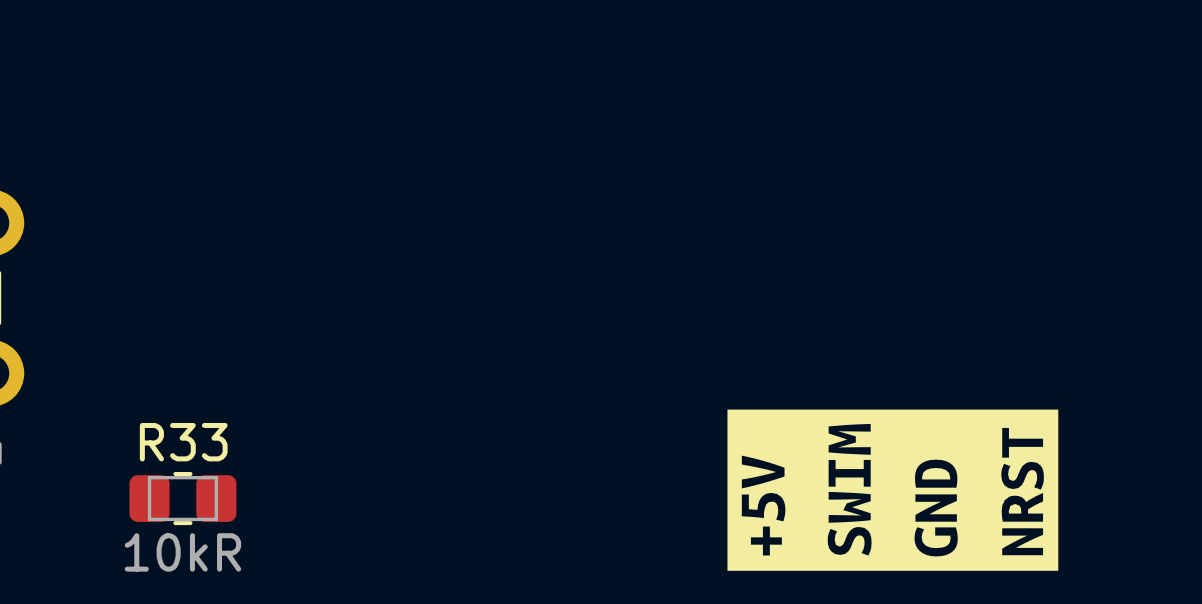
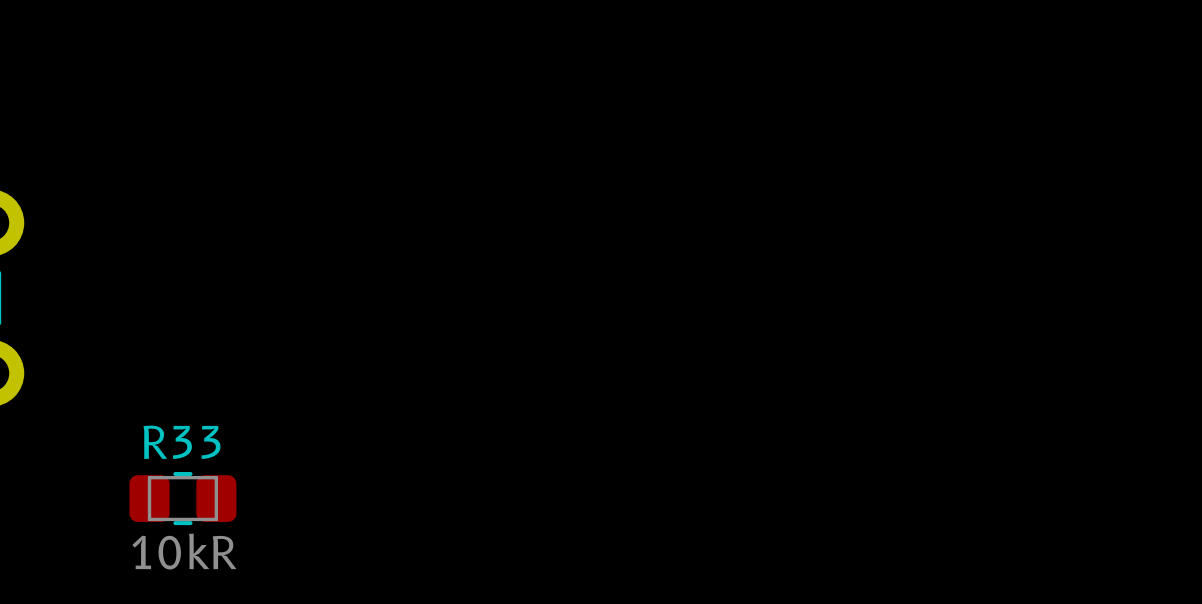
drawing: [727, 409, 1059, 571] -> none

